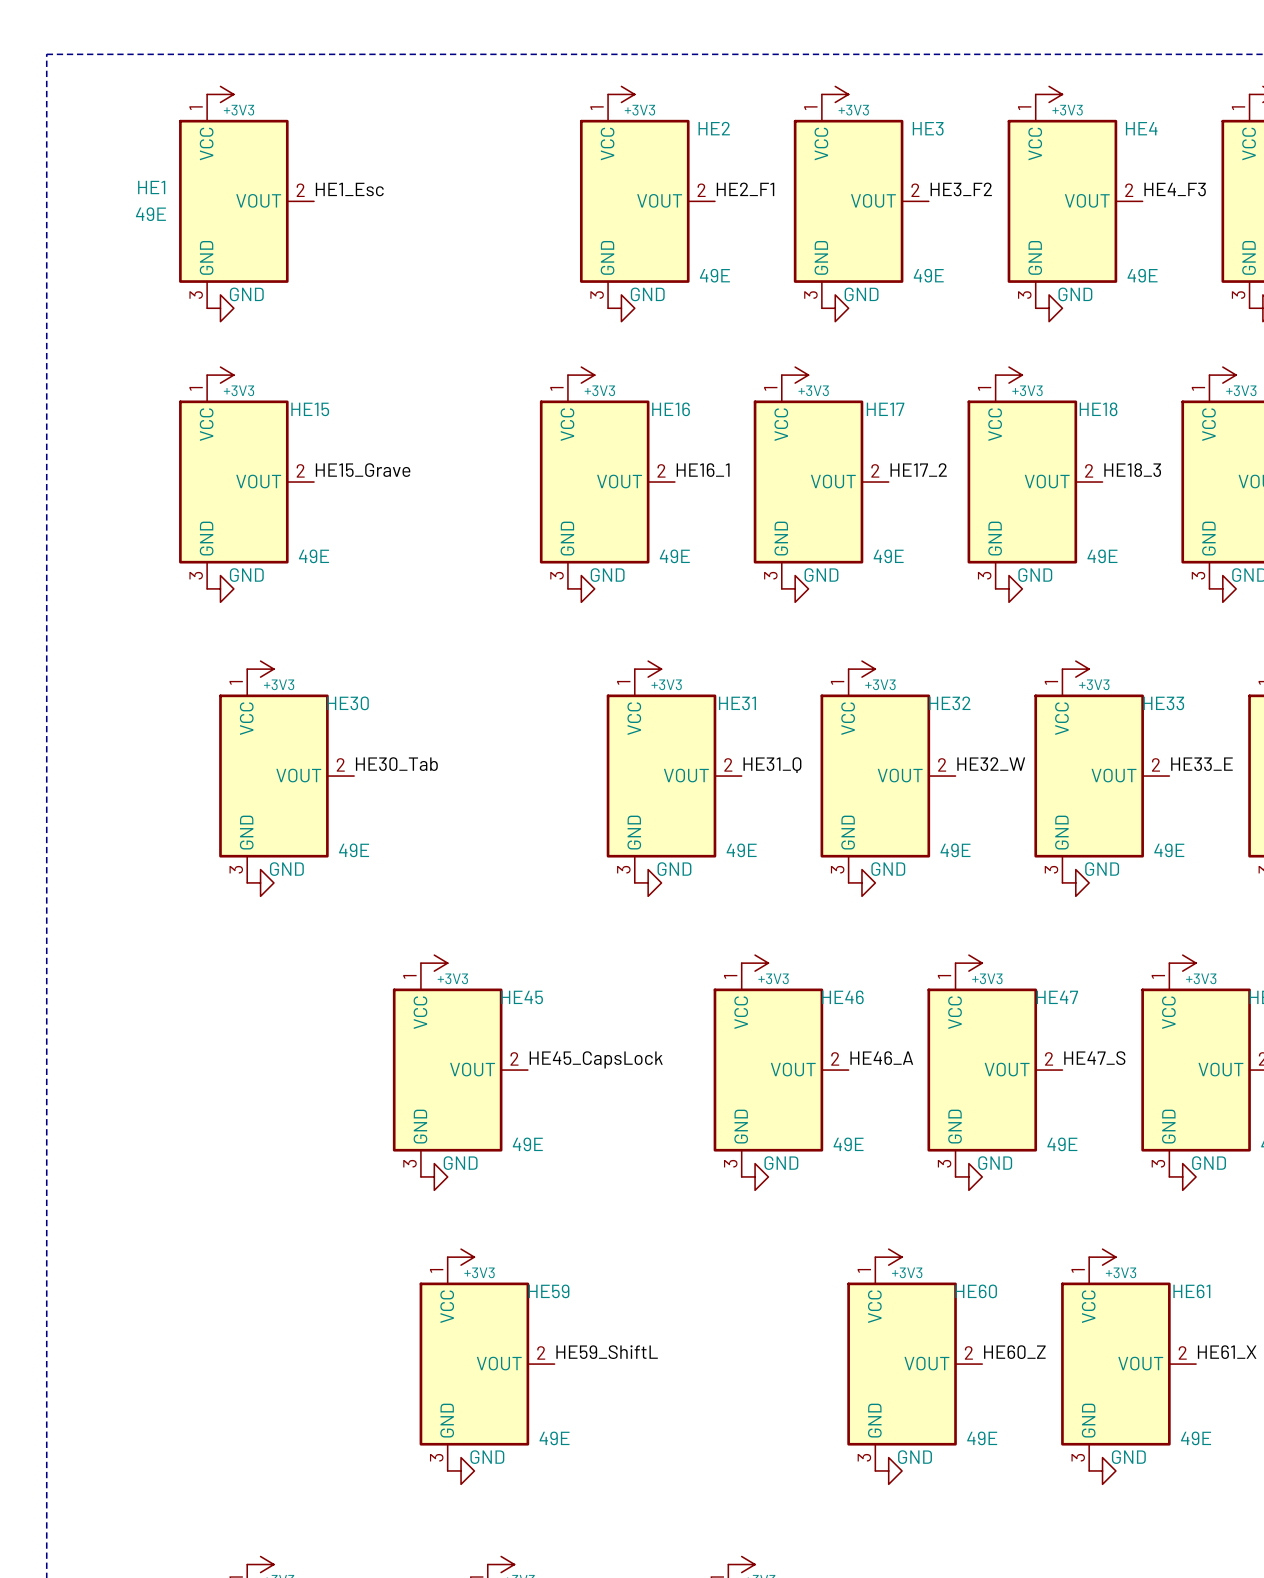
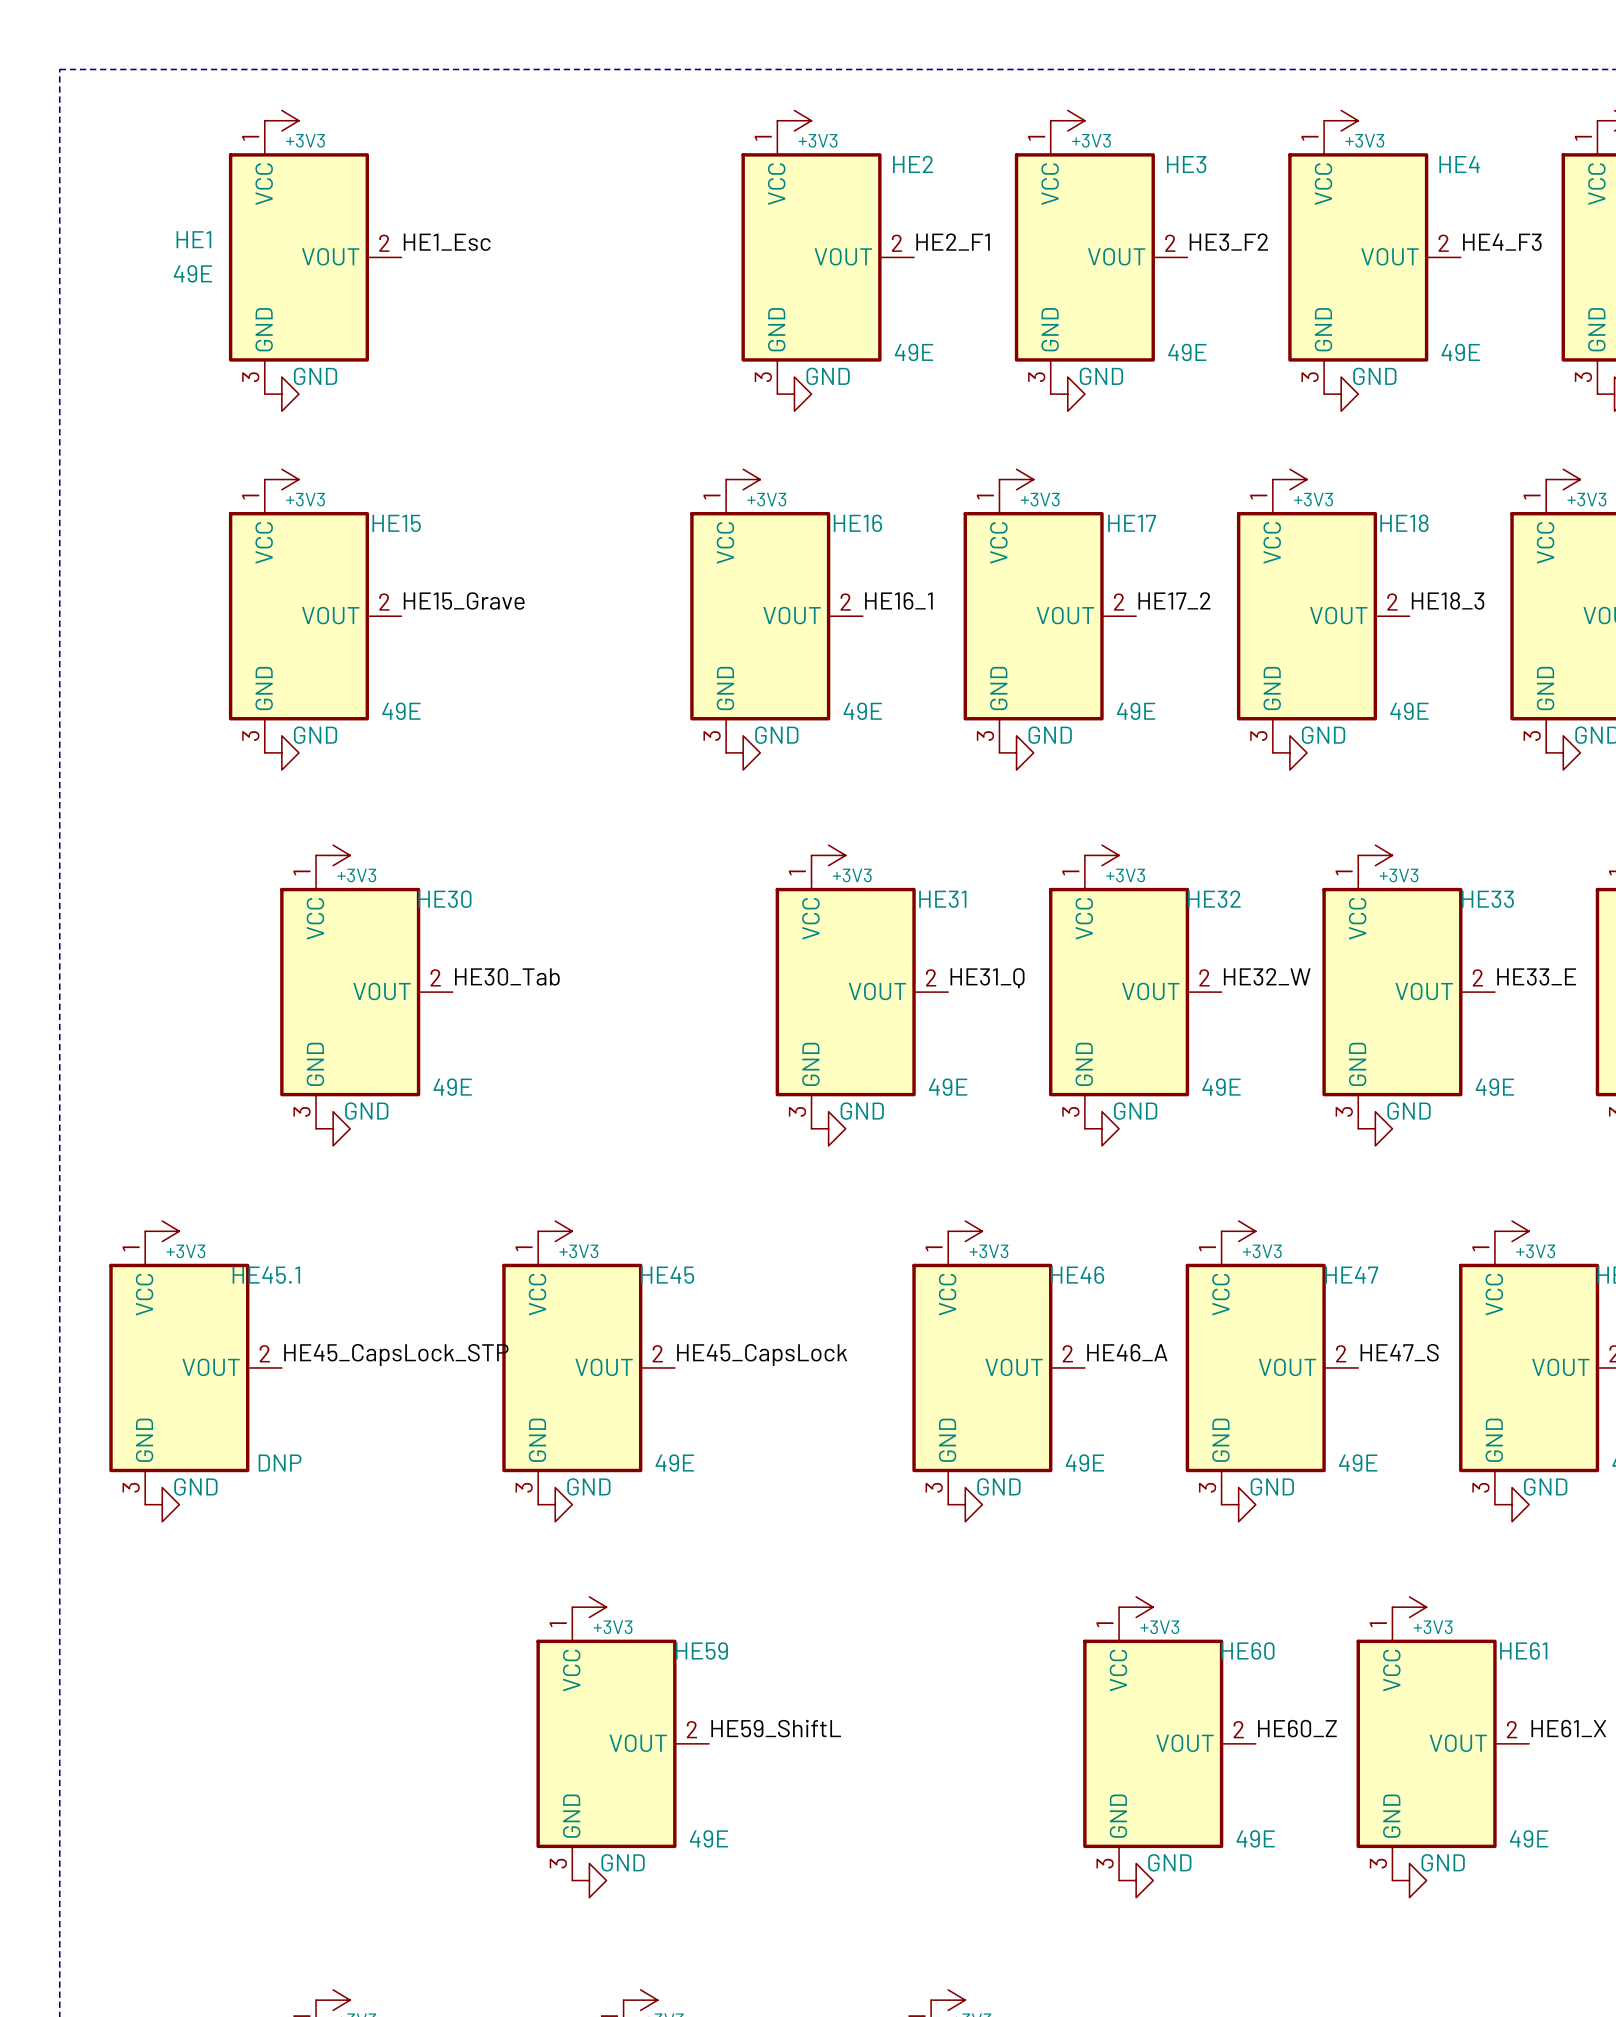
power symbol: none -> +3V3 (162, 1231)
label: none -> HE45_CapsLock_STP (396, 1355)
HE45.1: none -> DNP (195, 1367)
power symbol: none -> GND (162, 1504)

